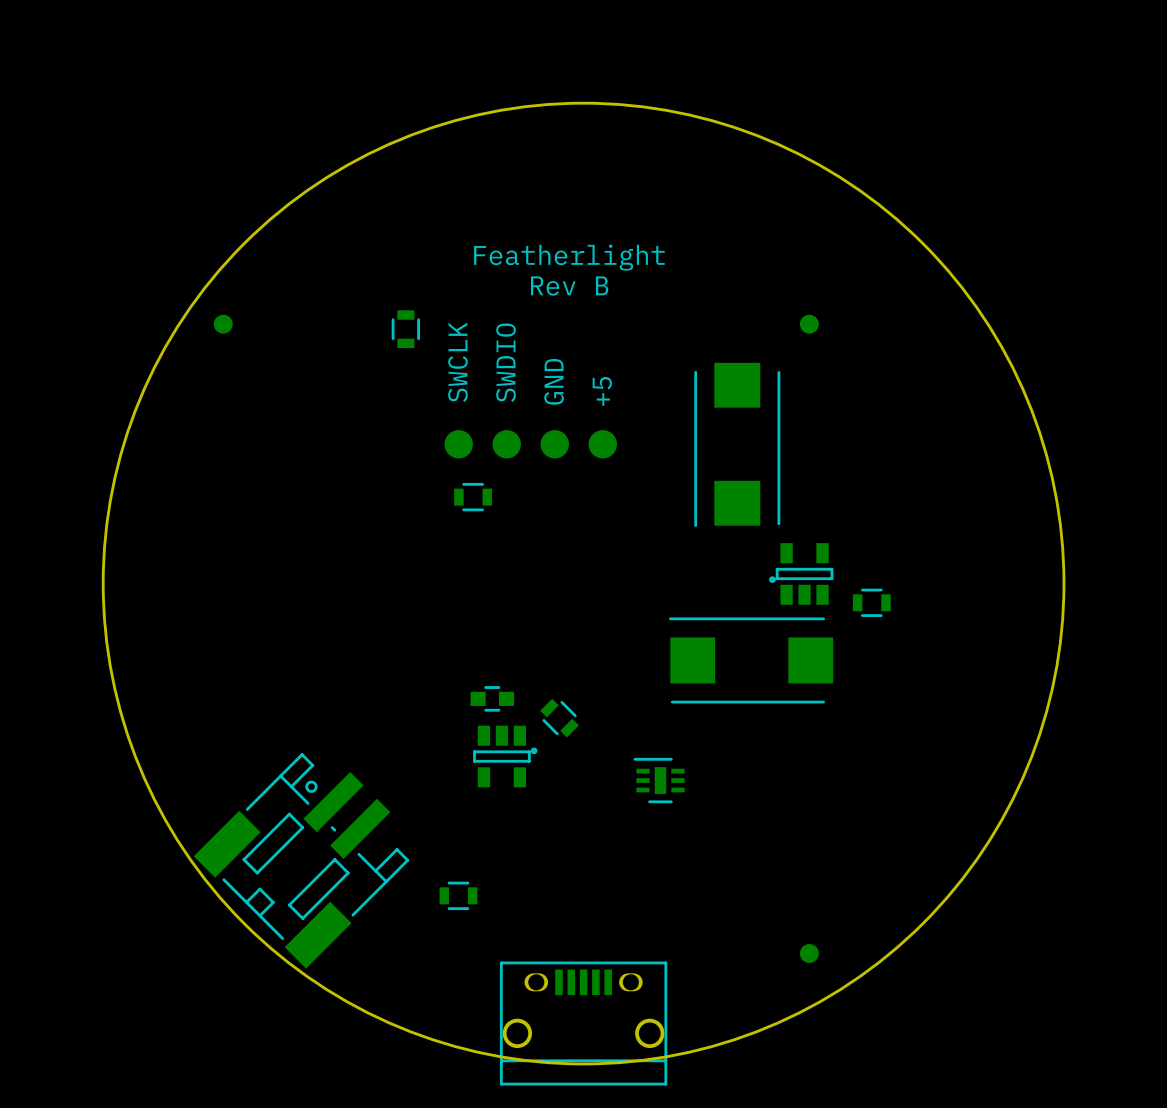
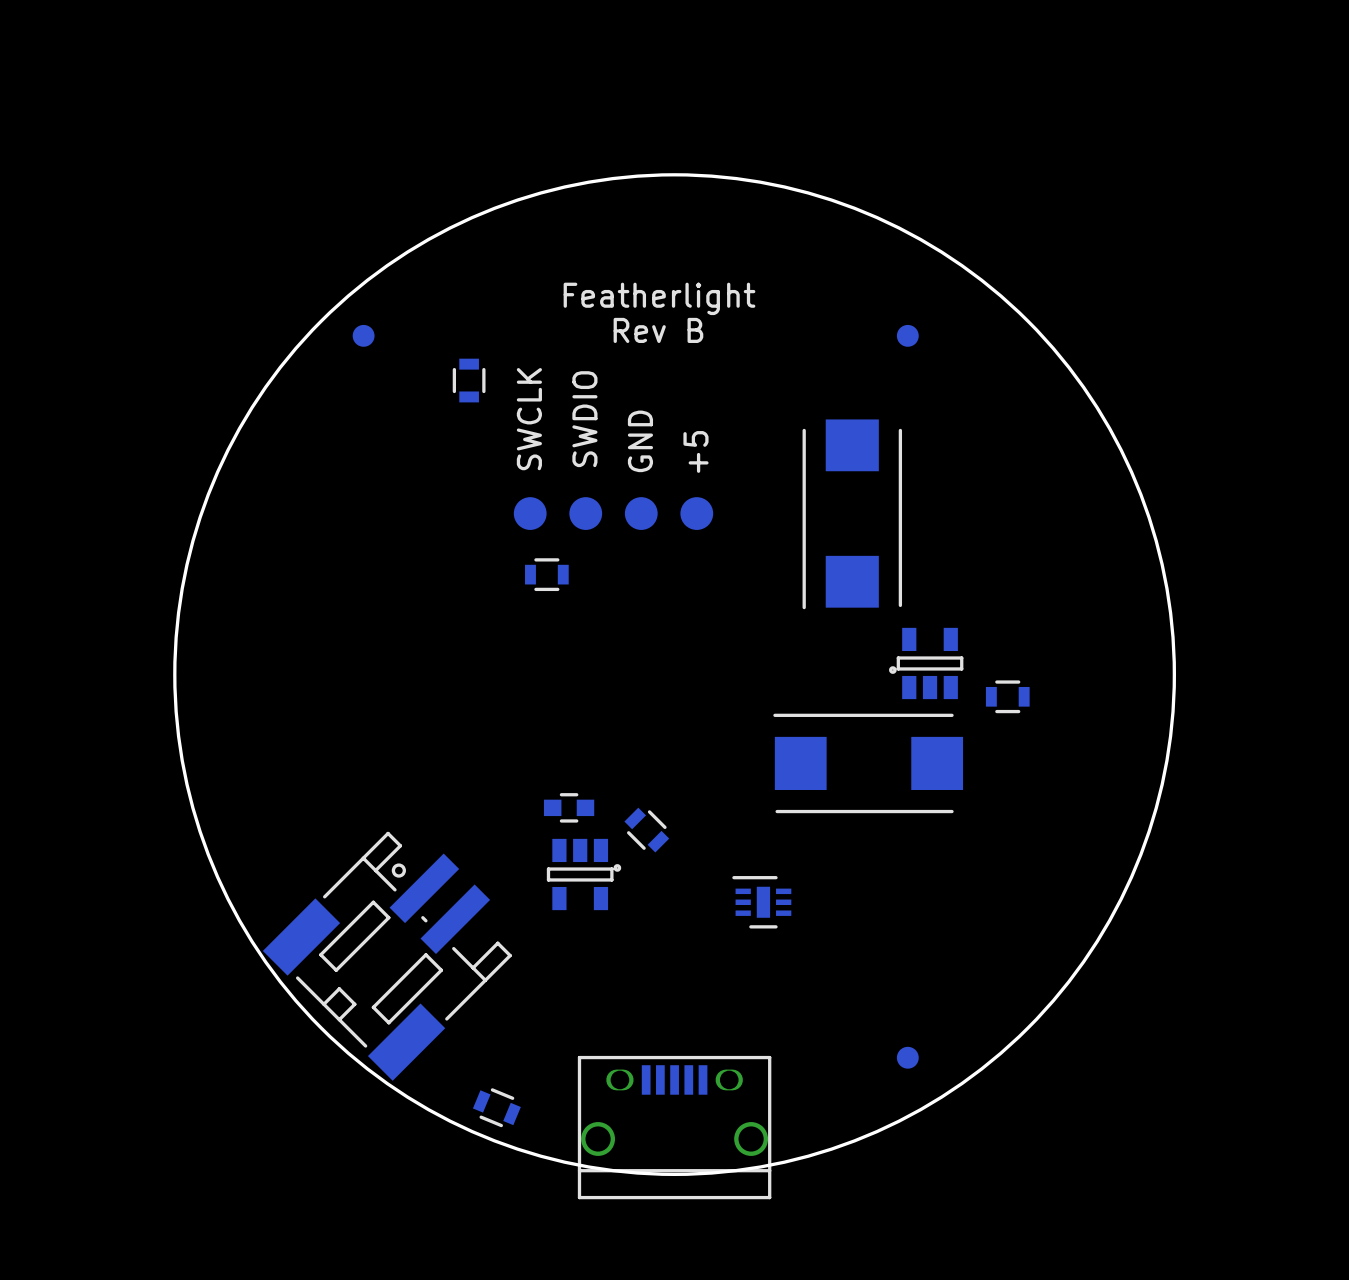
round board edge size: [101, 101, 1066, 1066] -> [173, 173, 1177, 1177]
part position: (223, 324) -> (363, 335)
part position: (809, 324) -> (907, 335)
part position: (301, 860) -> (387, 956)
part: (458, 895) -> none
part position: (809, 953) -> (907, 1057)
part: none -> (496, 1107)
part position: (583, 1023) -> (674, 1127)

